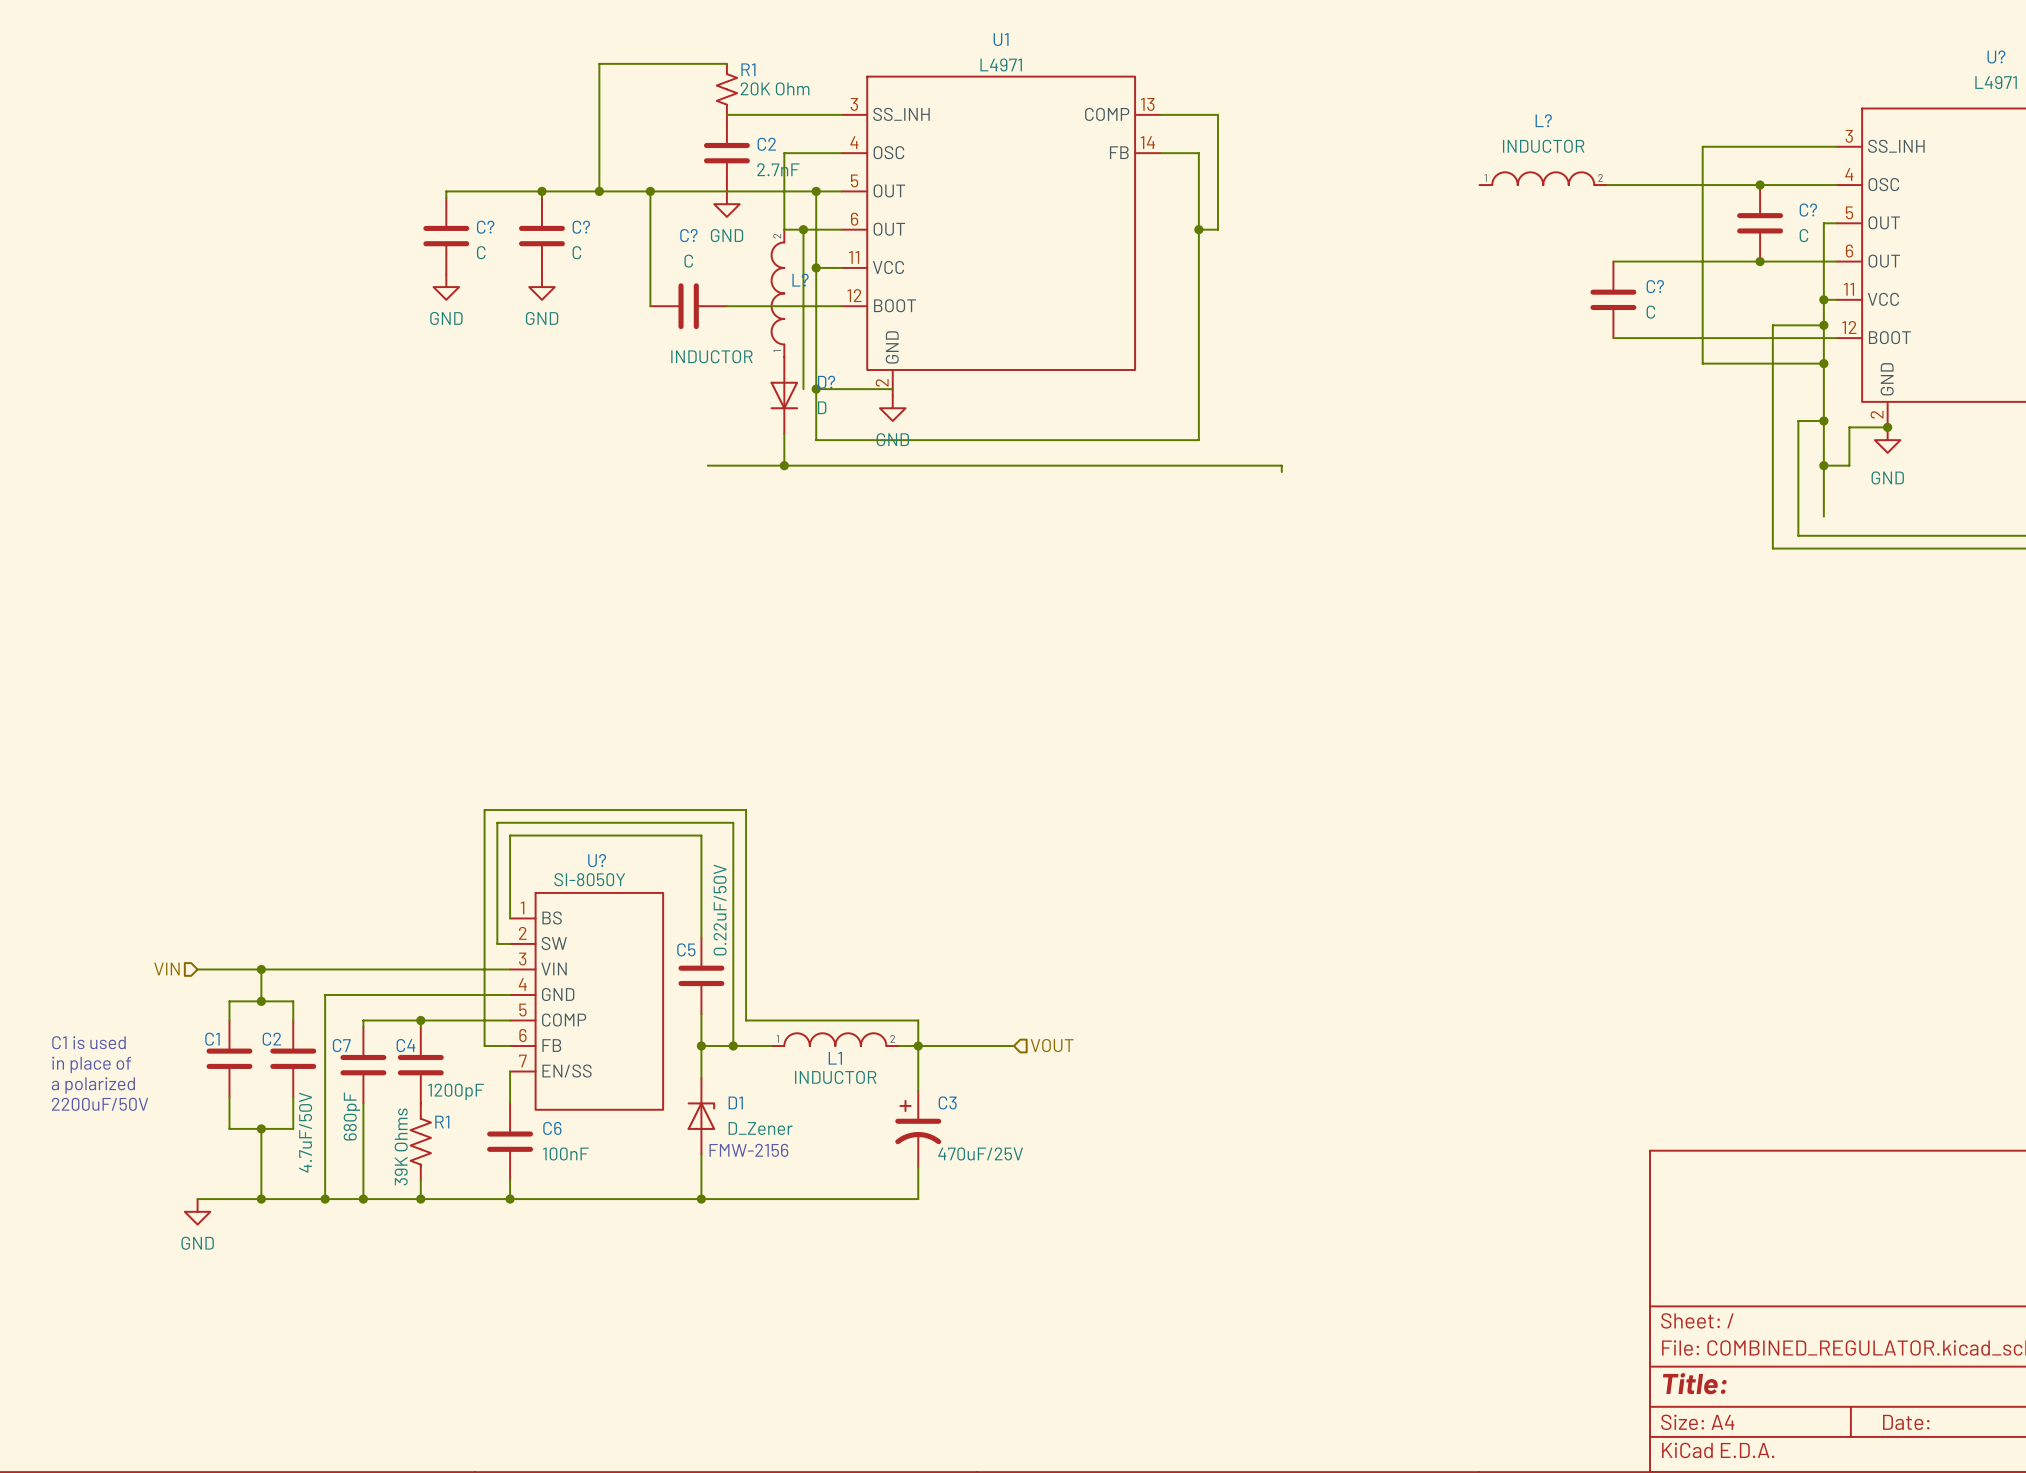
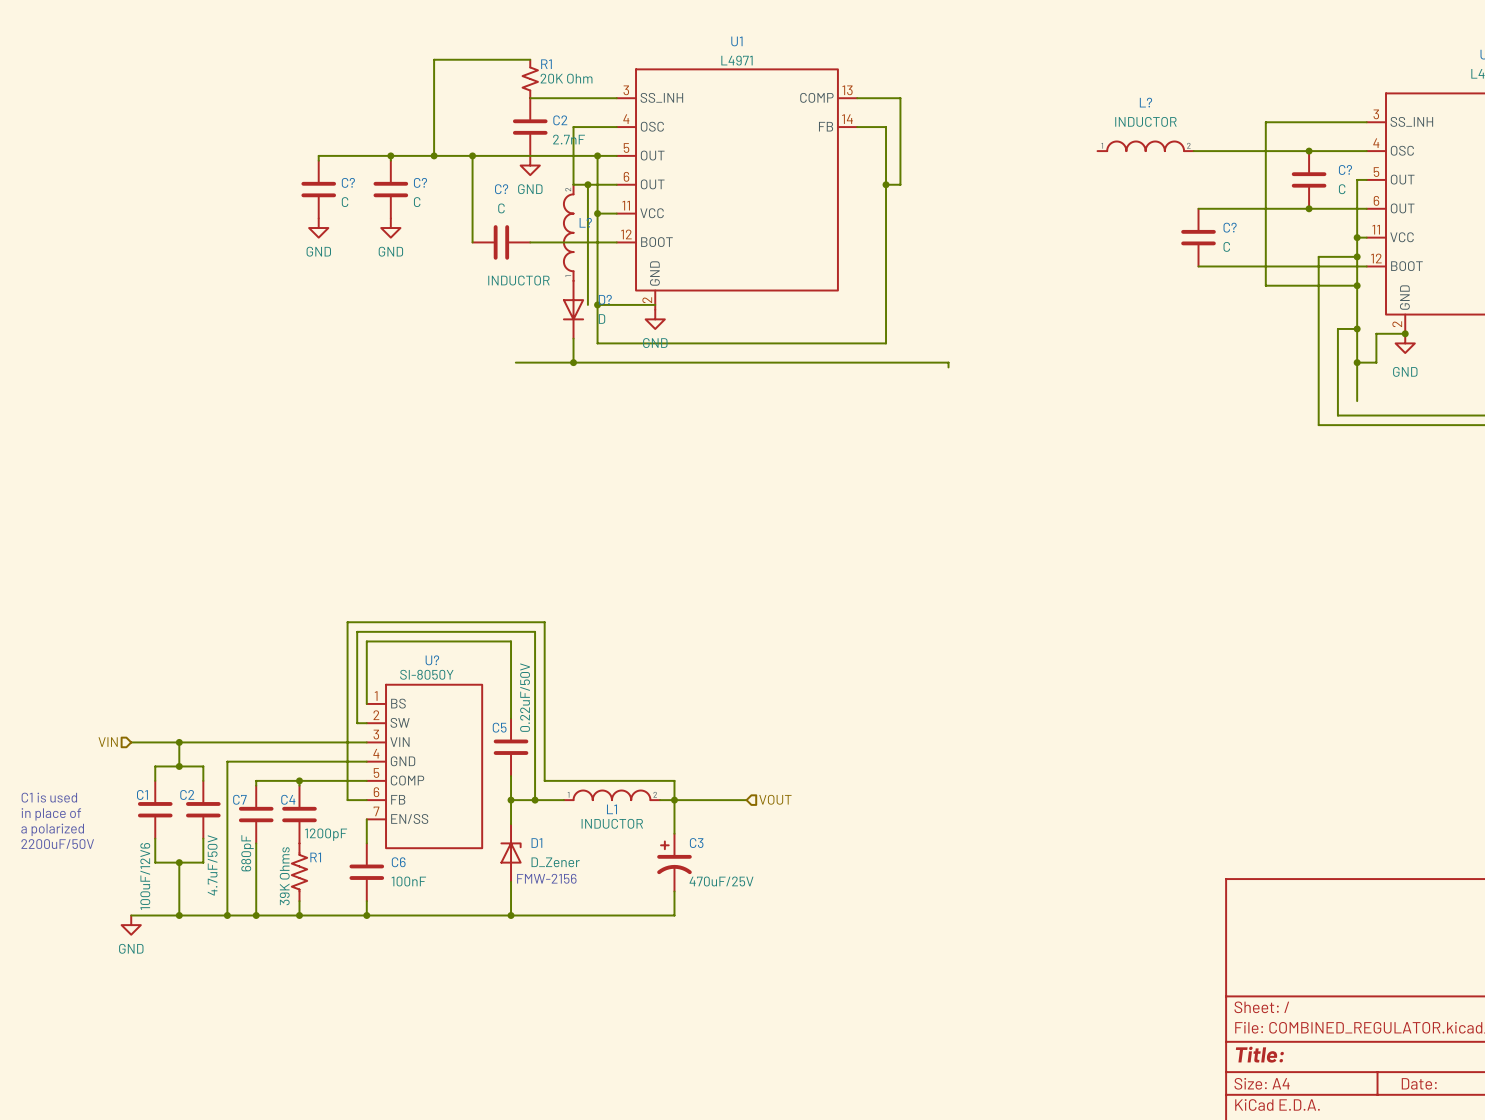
C1 value: none -> 100uF/12V6 (145, 876)

